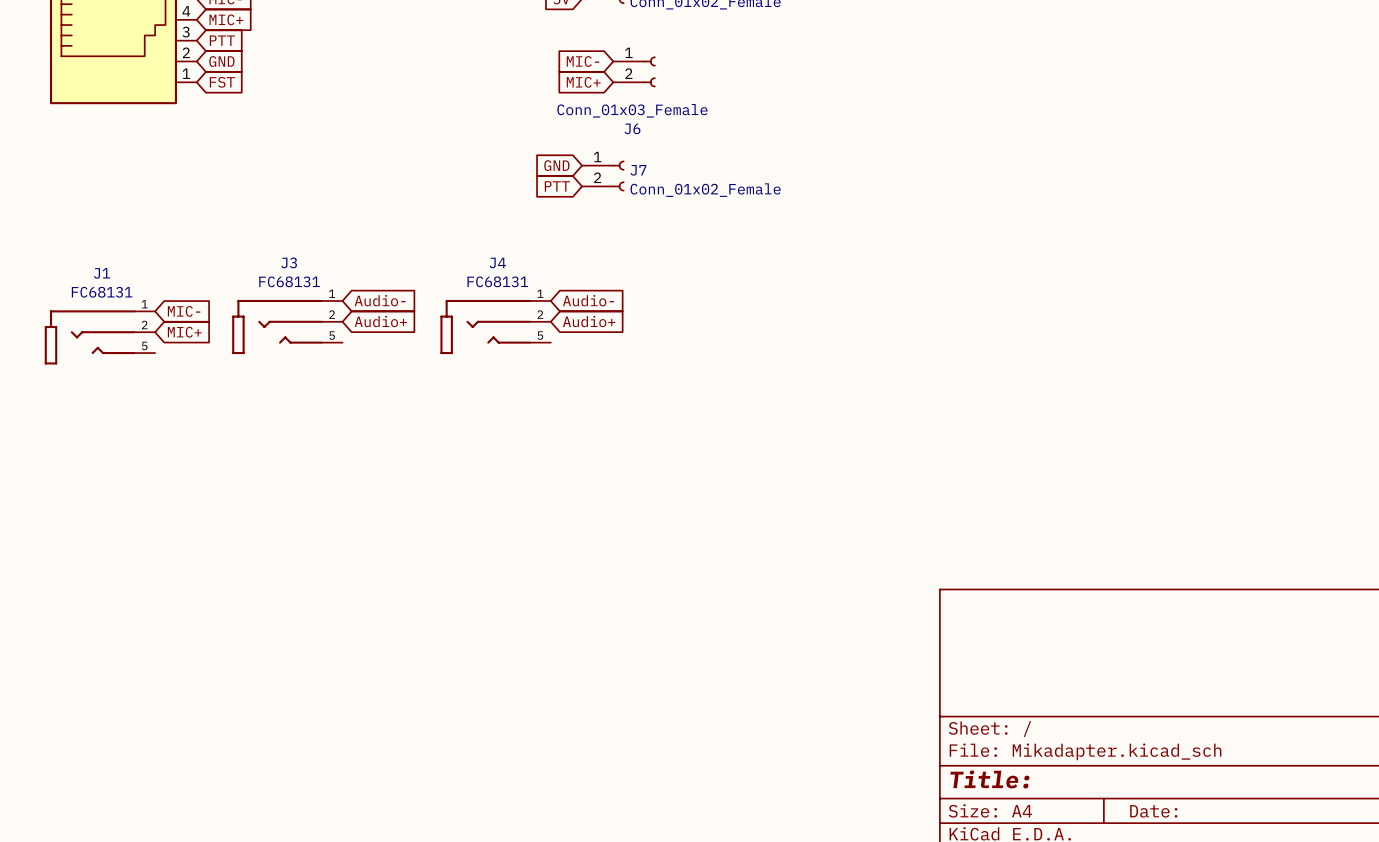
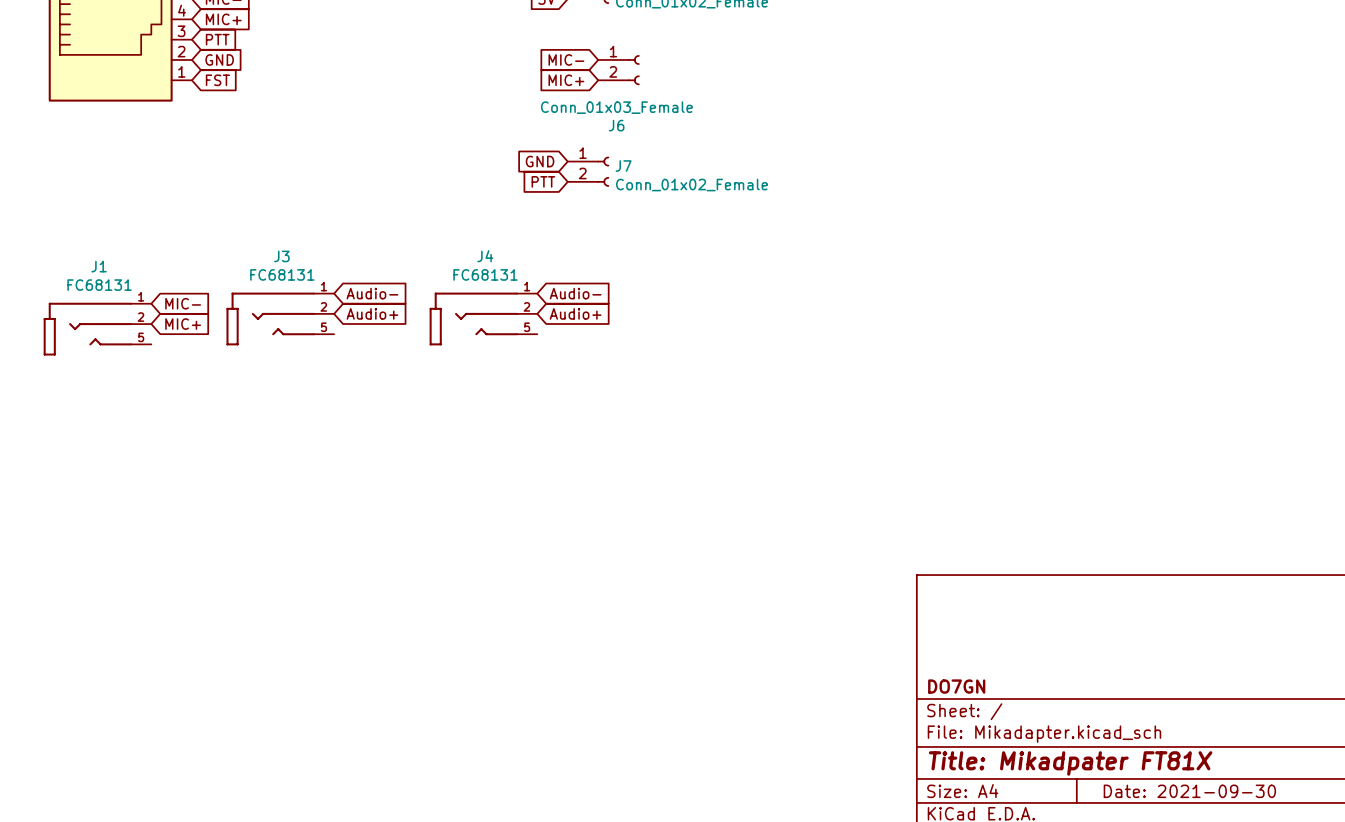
title block: none -> DO7GN (956, 686)
title block: Title: (989, 779) -> Title: Mikadpater FT81X (1070, 763)
title block: Date: (1153, 811) -> Date: 2021-09-30 (1189, 791)

